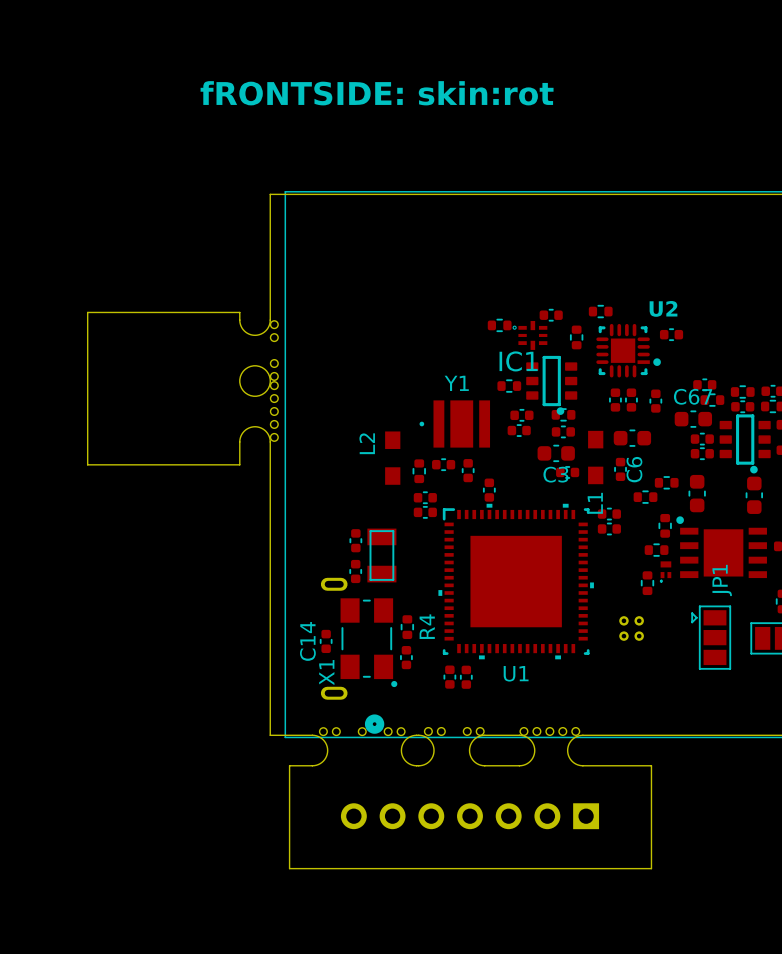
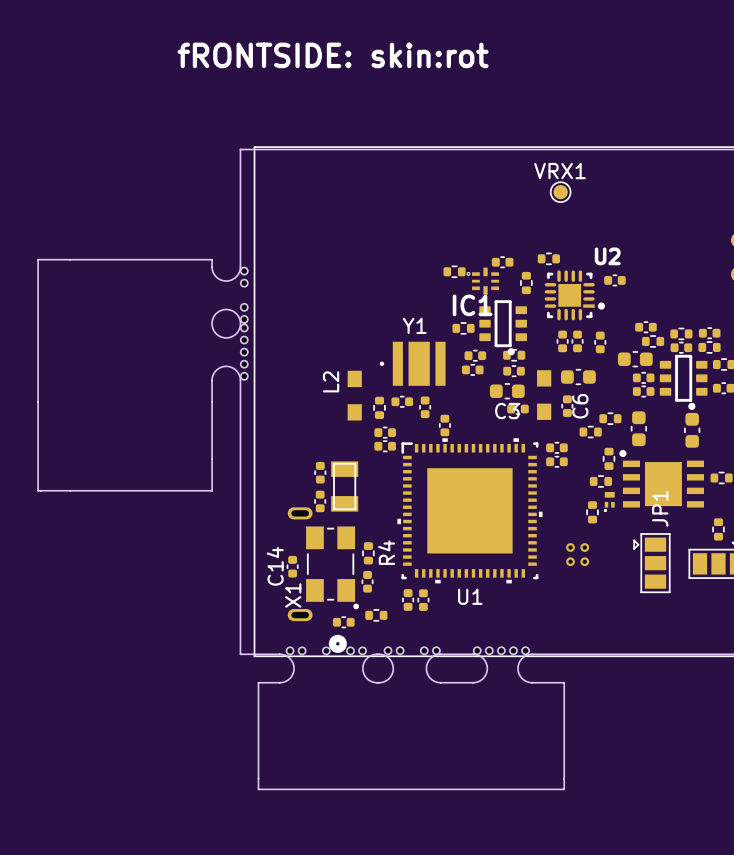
VRX1: none -> (560, 192)
board edge: (87, 312) (87, 464) (239, 464) -> (70, 259) (38, 259) (38, 490) (212, 490) (212, 401)
C67 name: C67 (693, 396) -> none
L1 name: L1 (595, 503) -> none
part: none -> (376, 615)
part: none -> (343, 622)
board edge: (617, 765) (651, 765) (651, 868) (289, 868) -> (564, 682) (564, 789) (258, 789) (258, 778)
part: (469, 816) -> none

